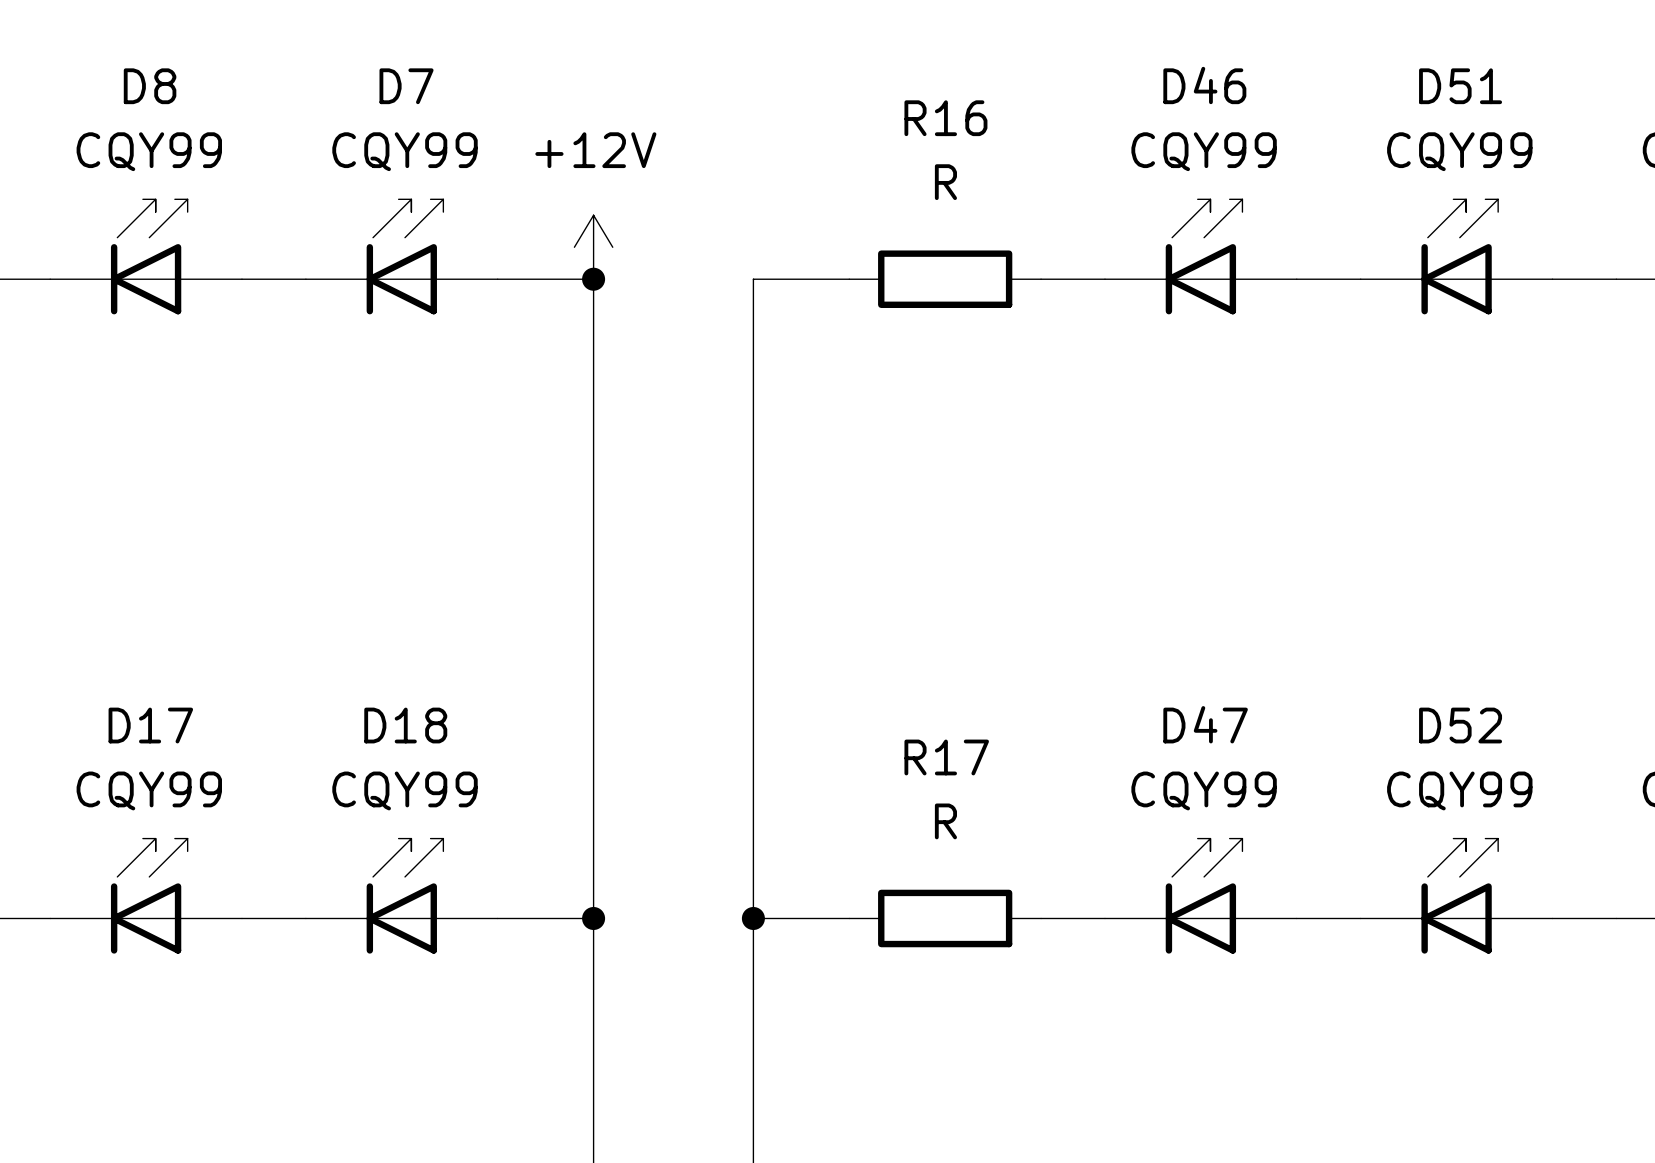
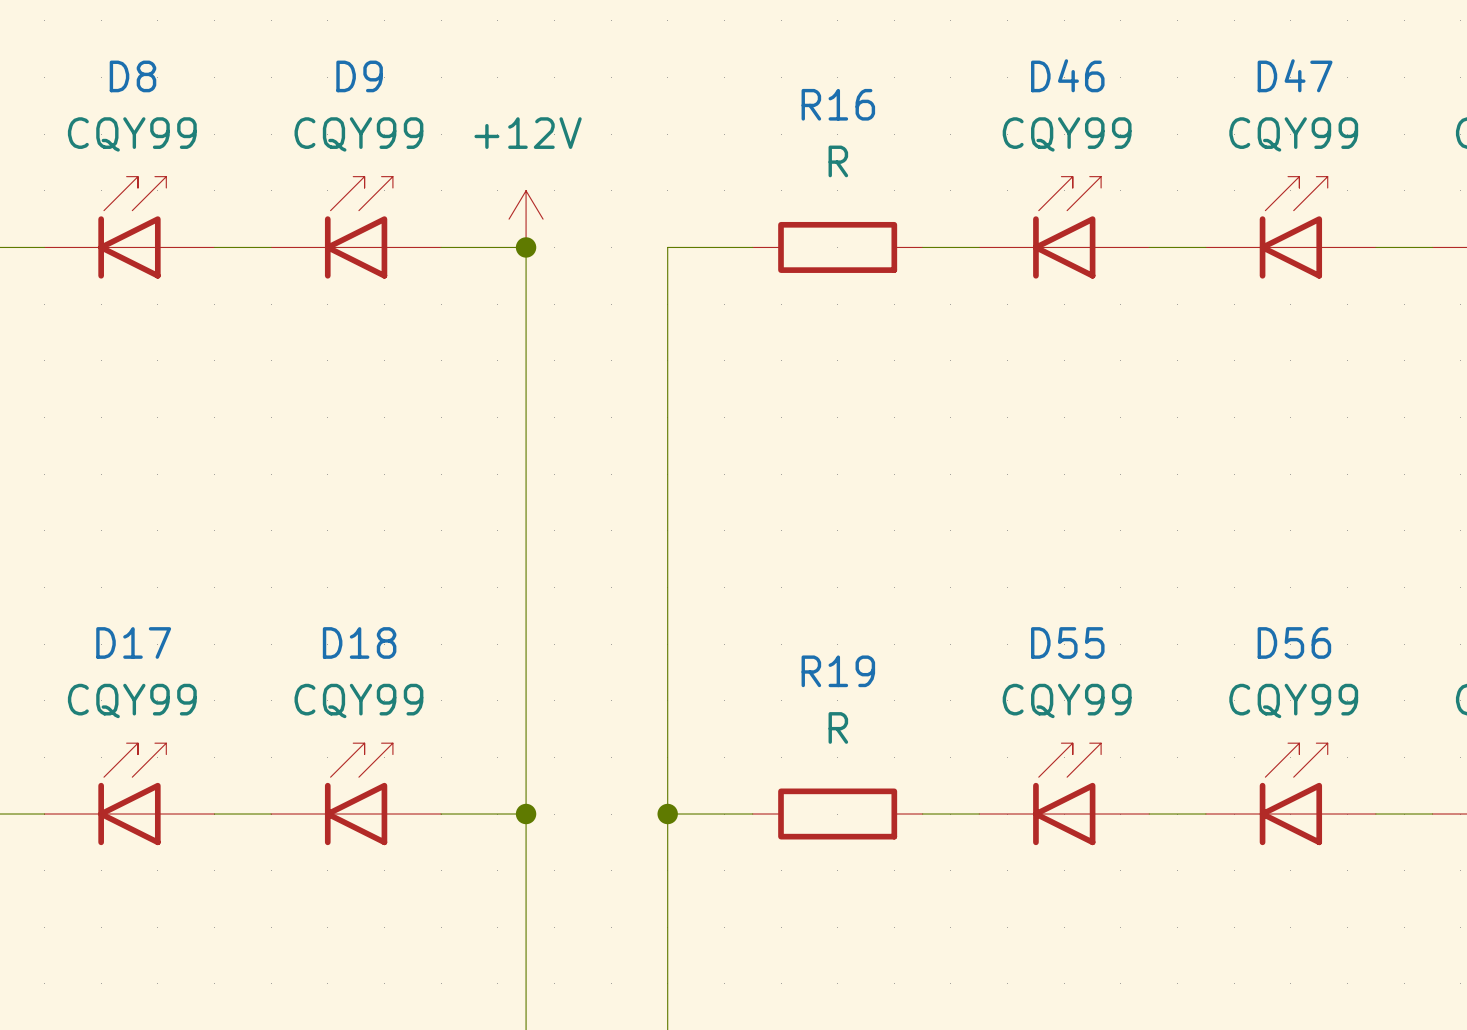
D7 name: D7 (406, 86) -> D9 (359, 76)
D51 name: D51 (1460, 86) -> D47 (1295, 75)
D47 name: D47 (1205, 724) -> D55 (1067, 642)
D52 name: D52 (1460, 725) -> D56 (1294, 642)
R17 name: R17 (946, 757) -> R19 (838, 671)

